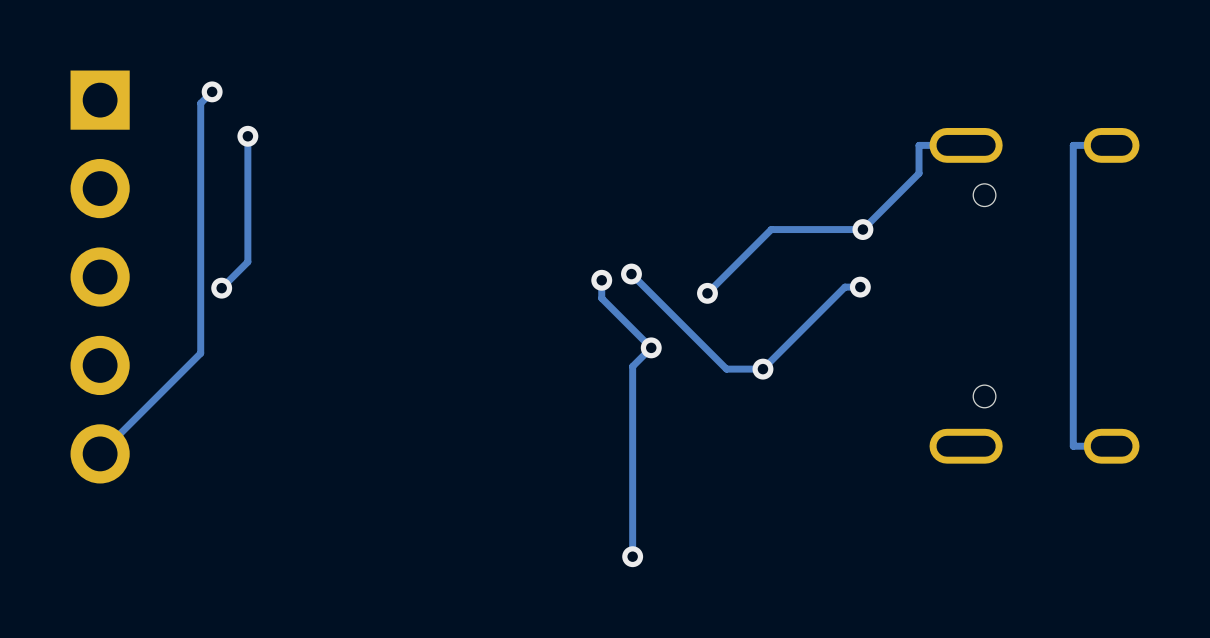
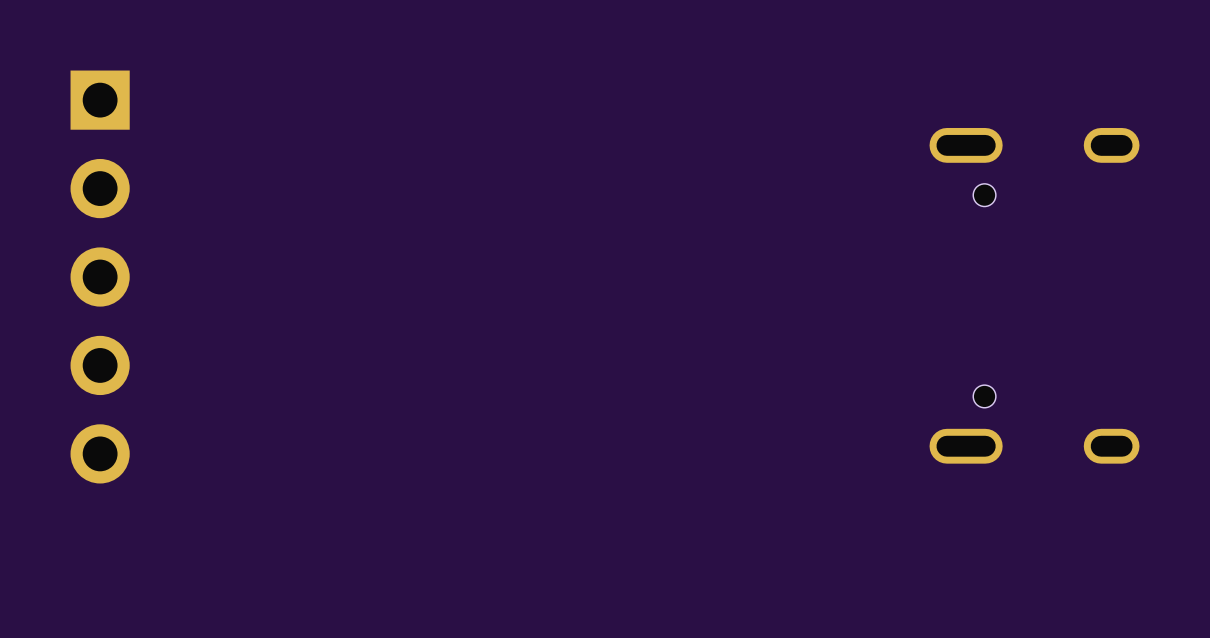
track: (212, 91) (200, 103) (200, 353) (100, 453) -> none
via: (212, 91) -> none
track: (247, 136) (247, 261) (221, 288) -> none
via: (247, 136) -> none
track: (966, 145) (919, 145) (919, 173) (862, 229) (771, 229) (707, 293) -> none
track: (1111, 145) (1073, 145) (1073, 446) (1111, 446) -> none
via: (862, 229) -> none
track: (631, 274) (726, 369) (762, 369) (844, 287) (860, 287) -> none
via: (631, 274) -> none
track: (601, 280) (601, 298) (651, 347) (632, 366) (632, 556) -> none
via: (601, 280) -> none
via: (860, 287) -> none
via: (221, 288) -> none
via: (707, 293) -> none
via: (651, 347) -> none
via: (762, 369) -> none
via: (632, 556) -> none

